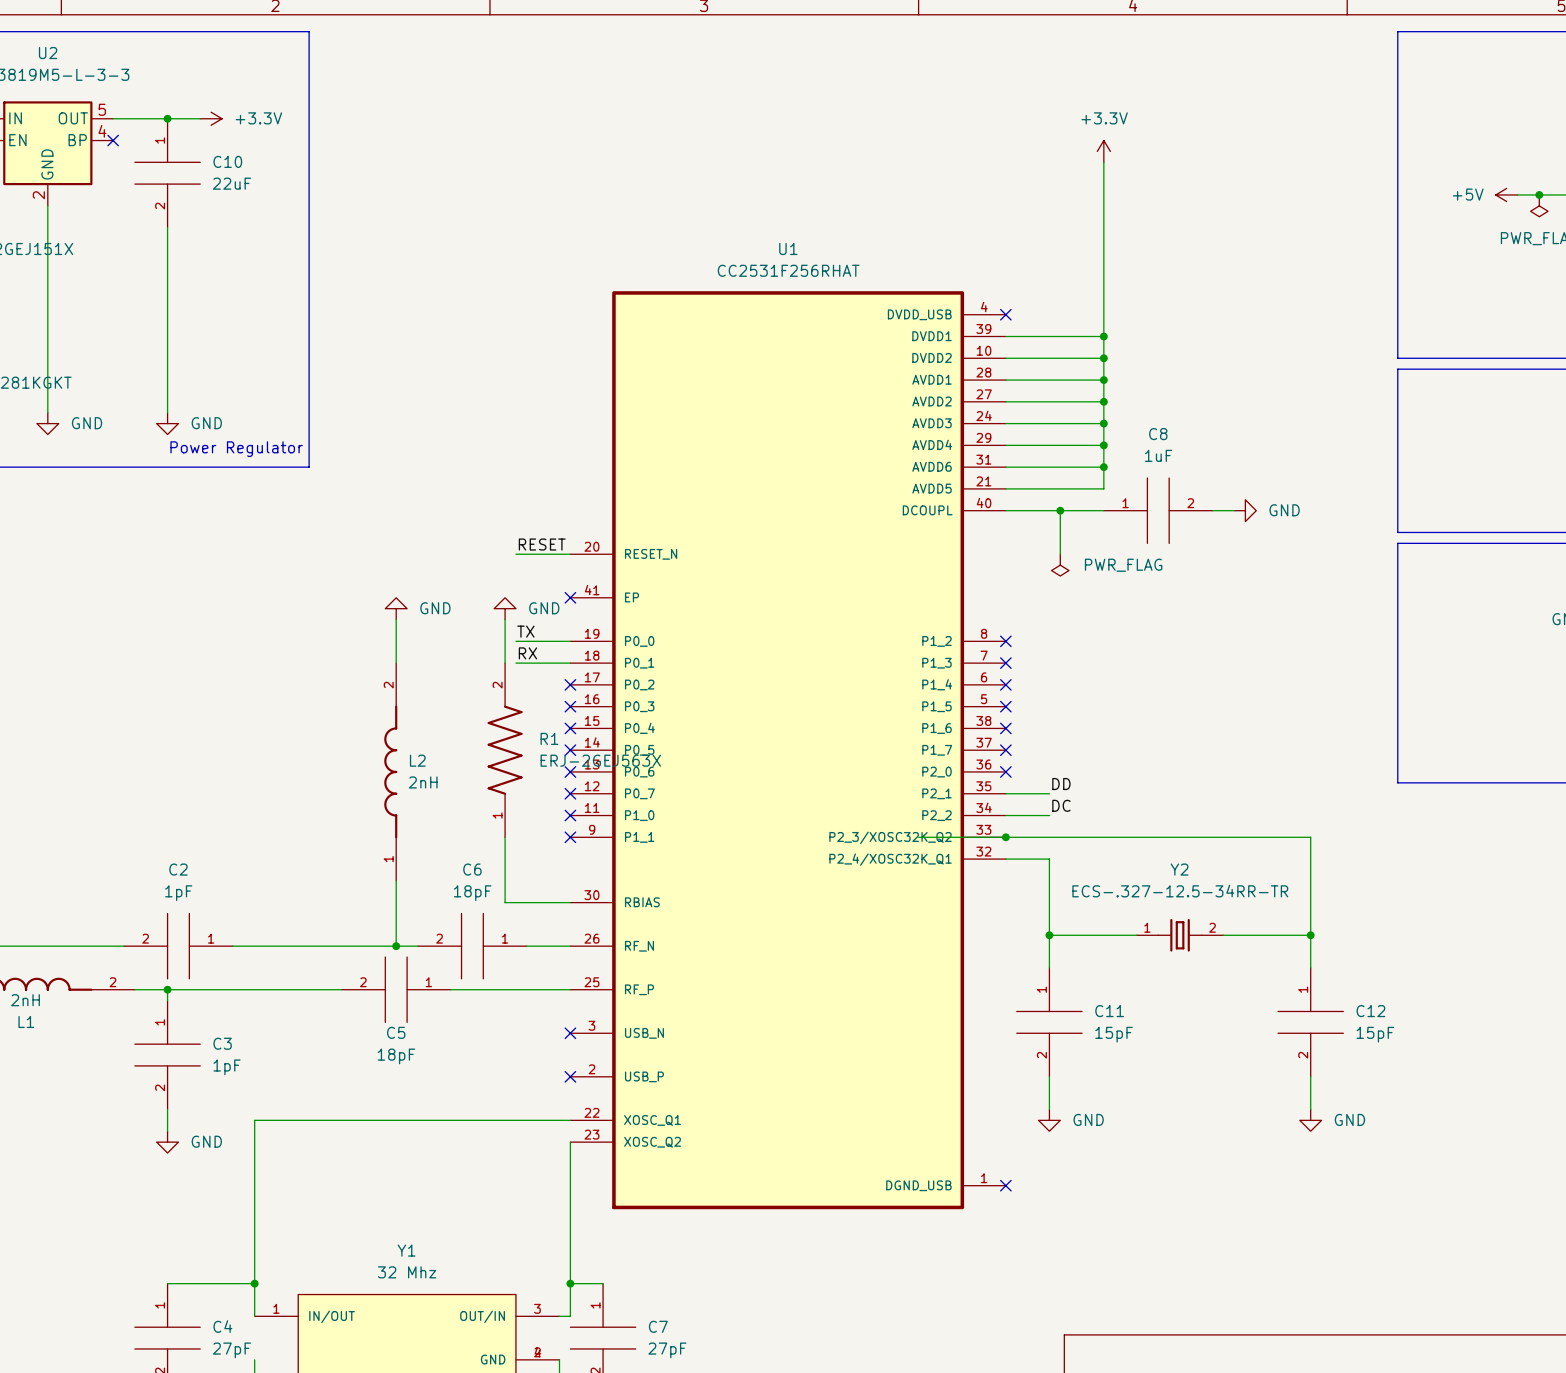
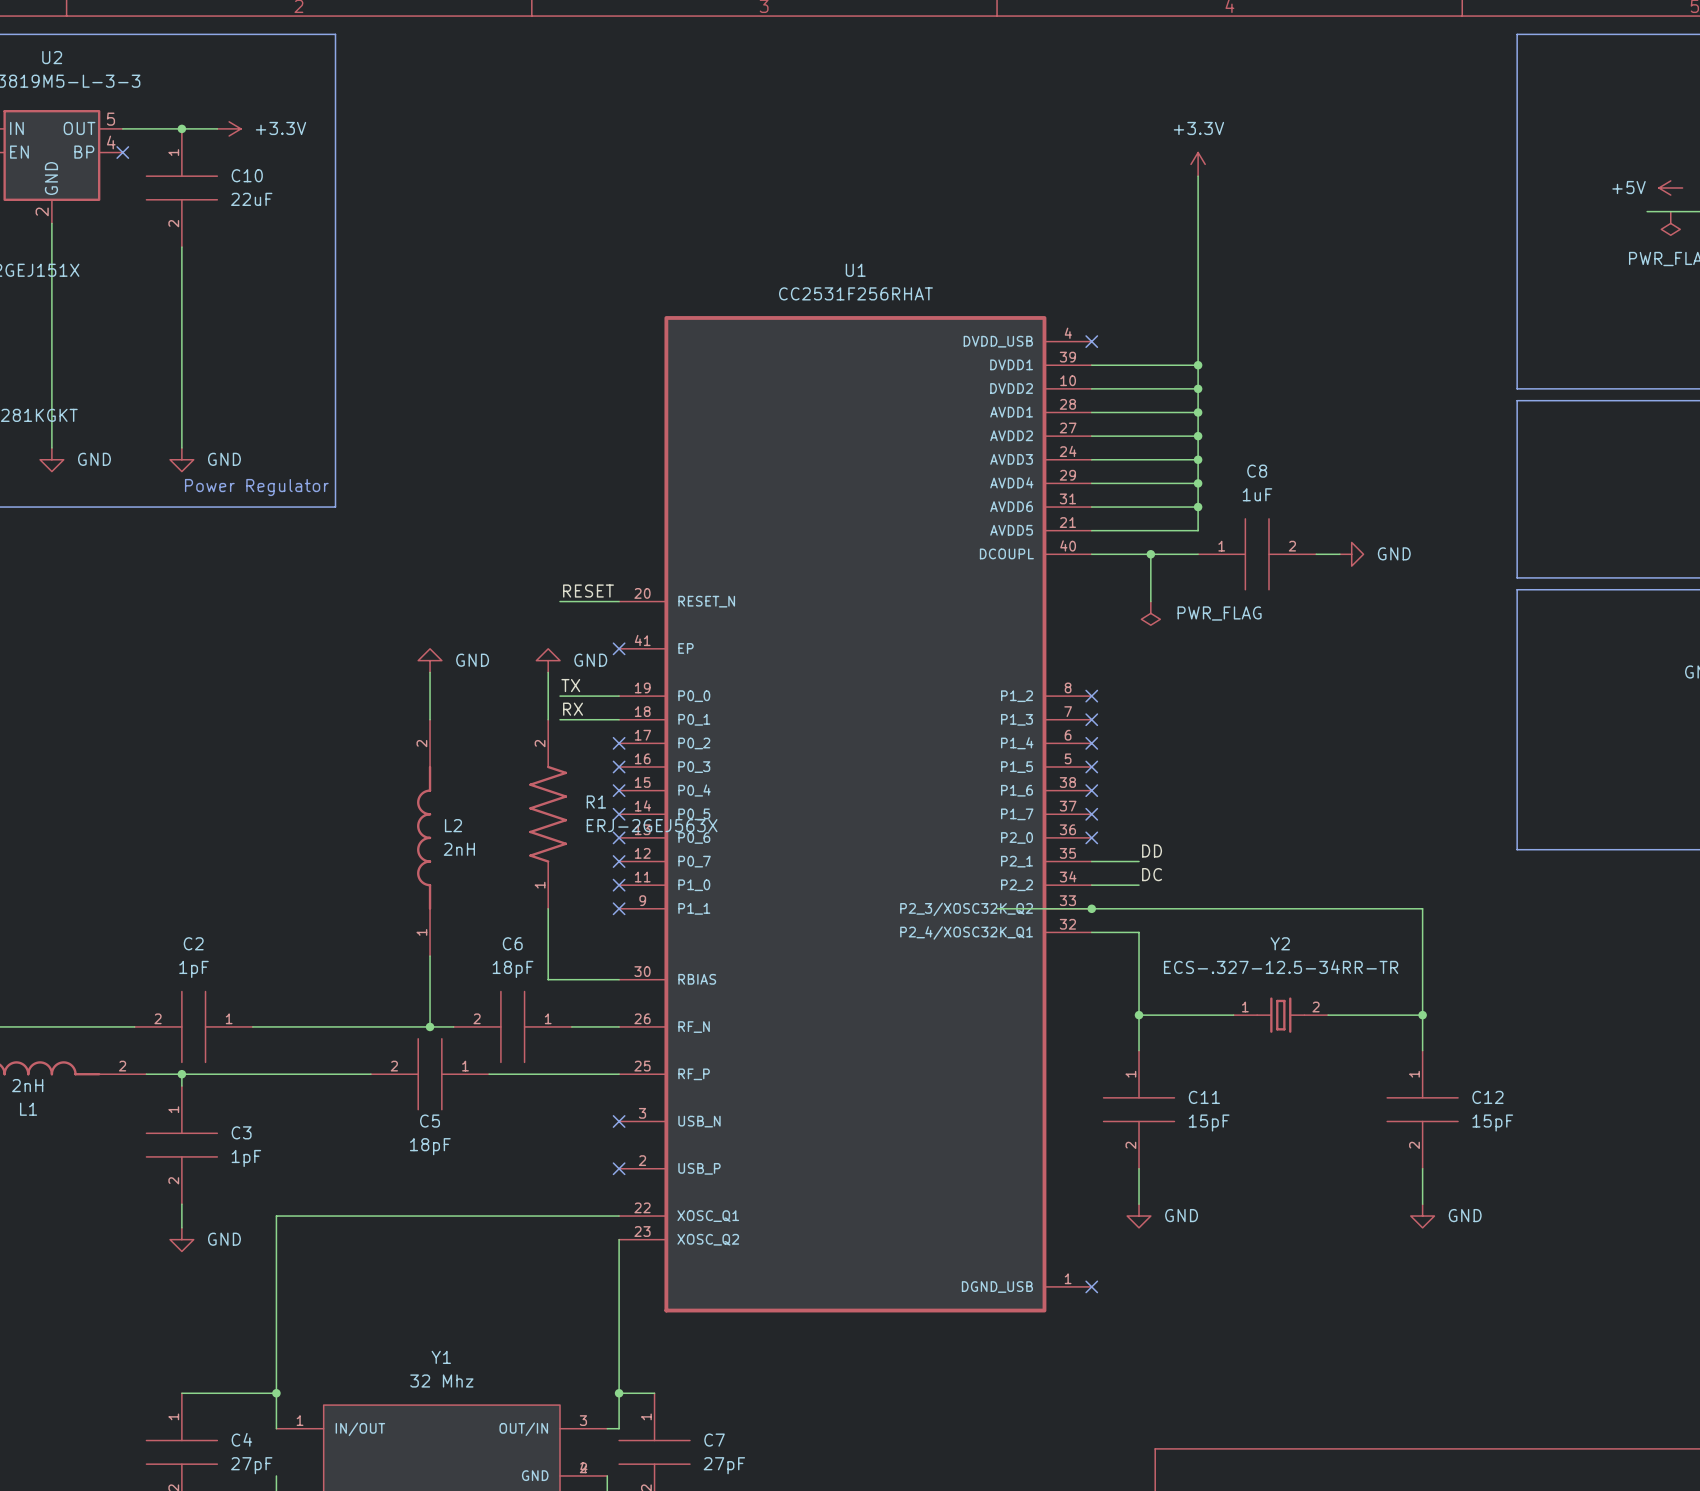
power symbol position: +5V (1506, 194) -> +5V (1670, 187)
junction: (1539, 194) -> none

